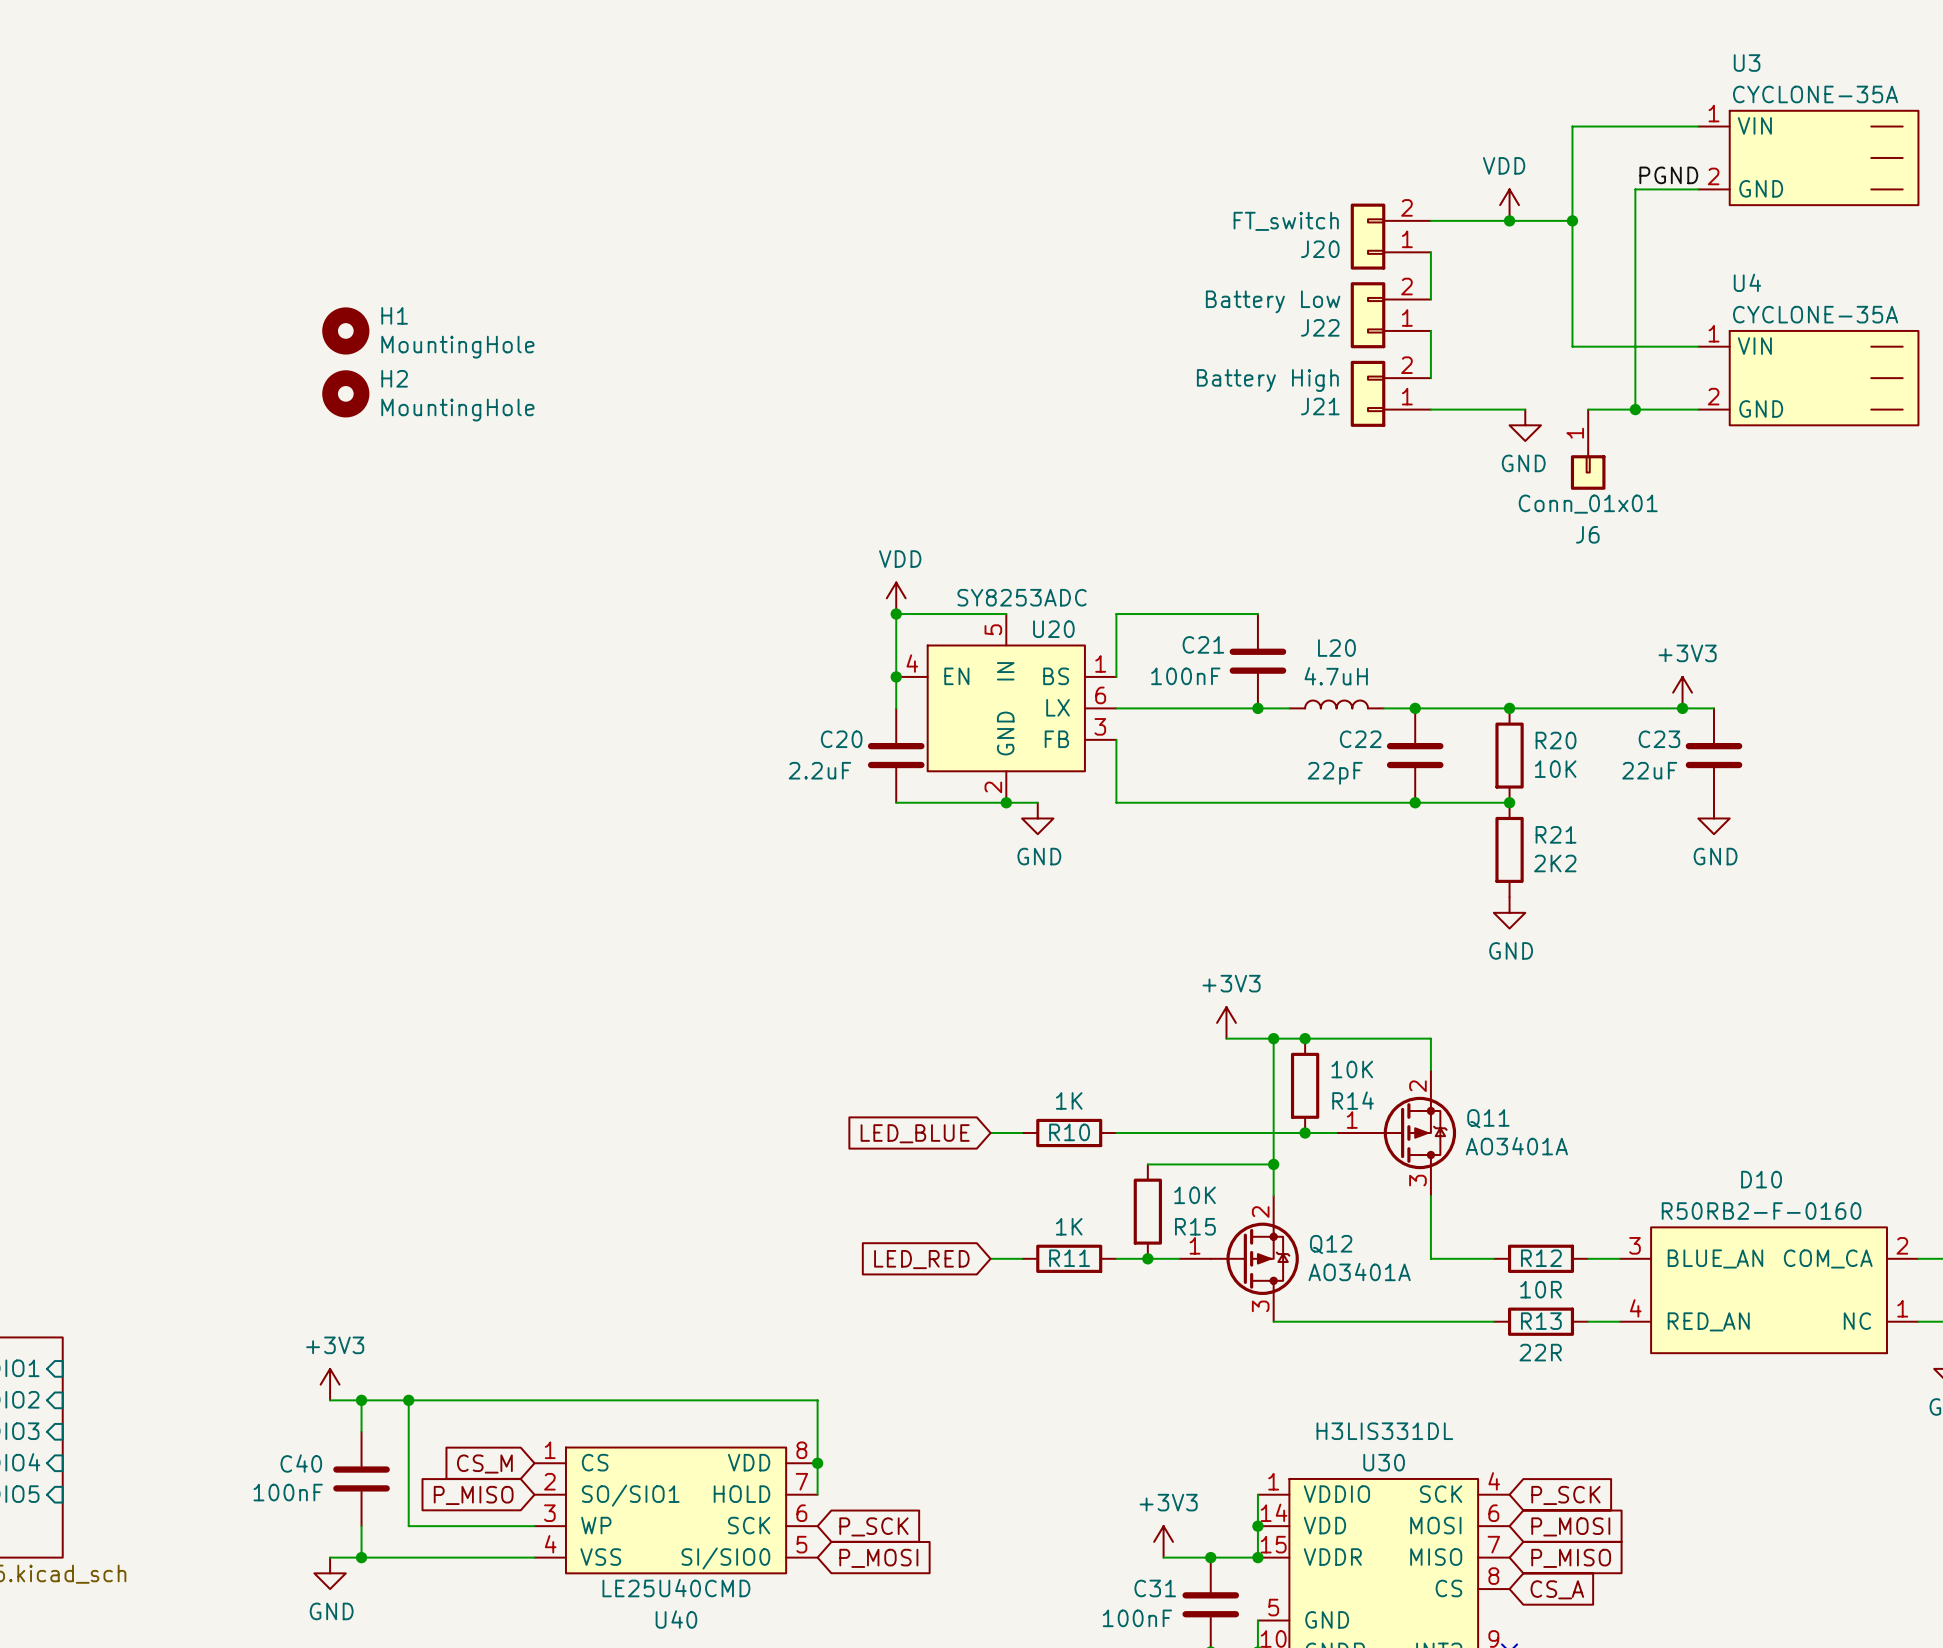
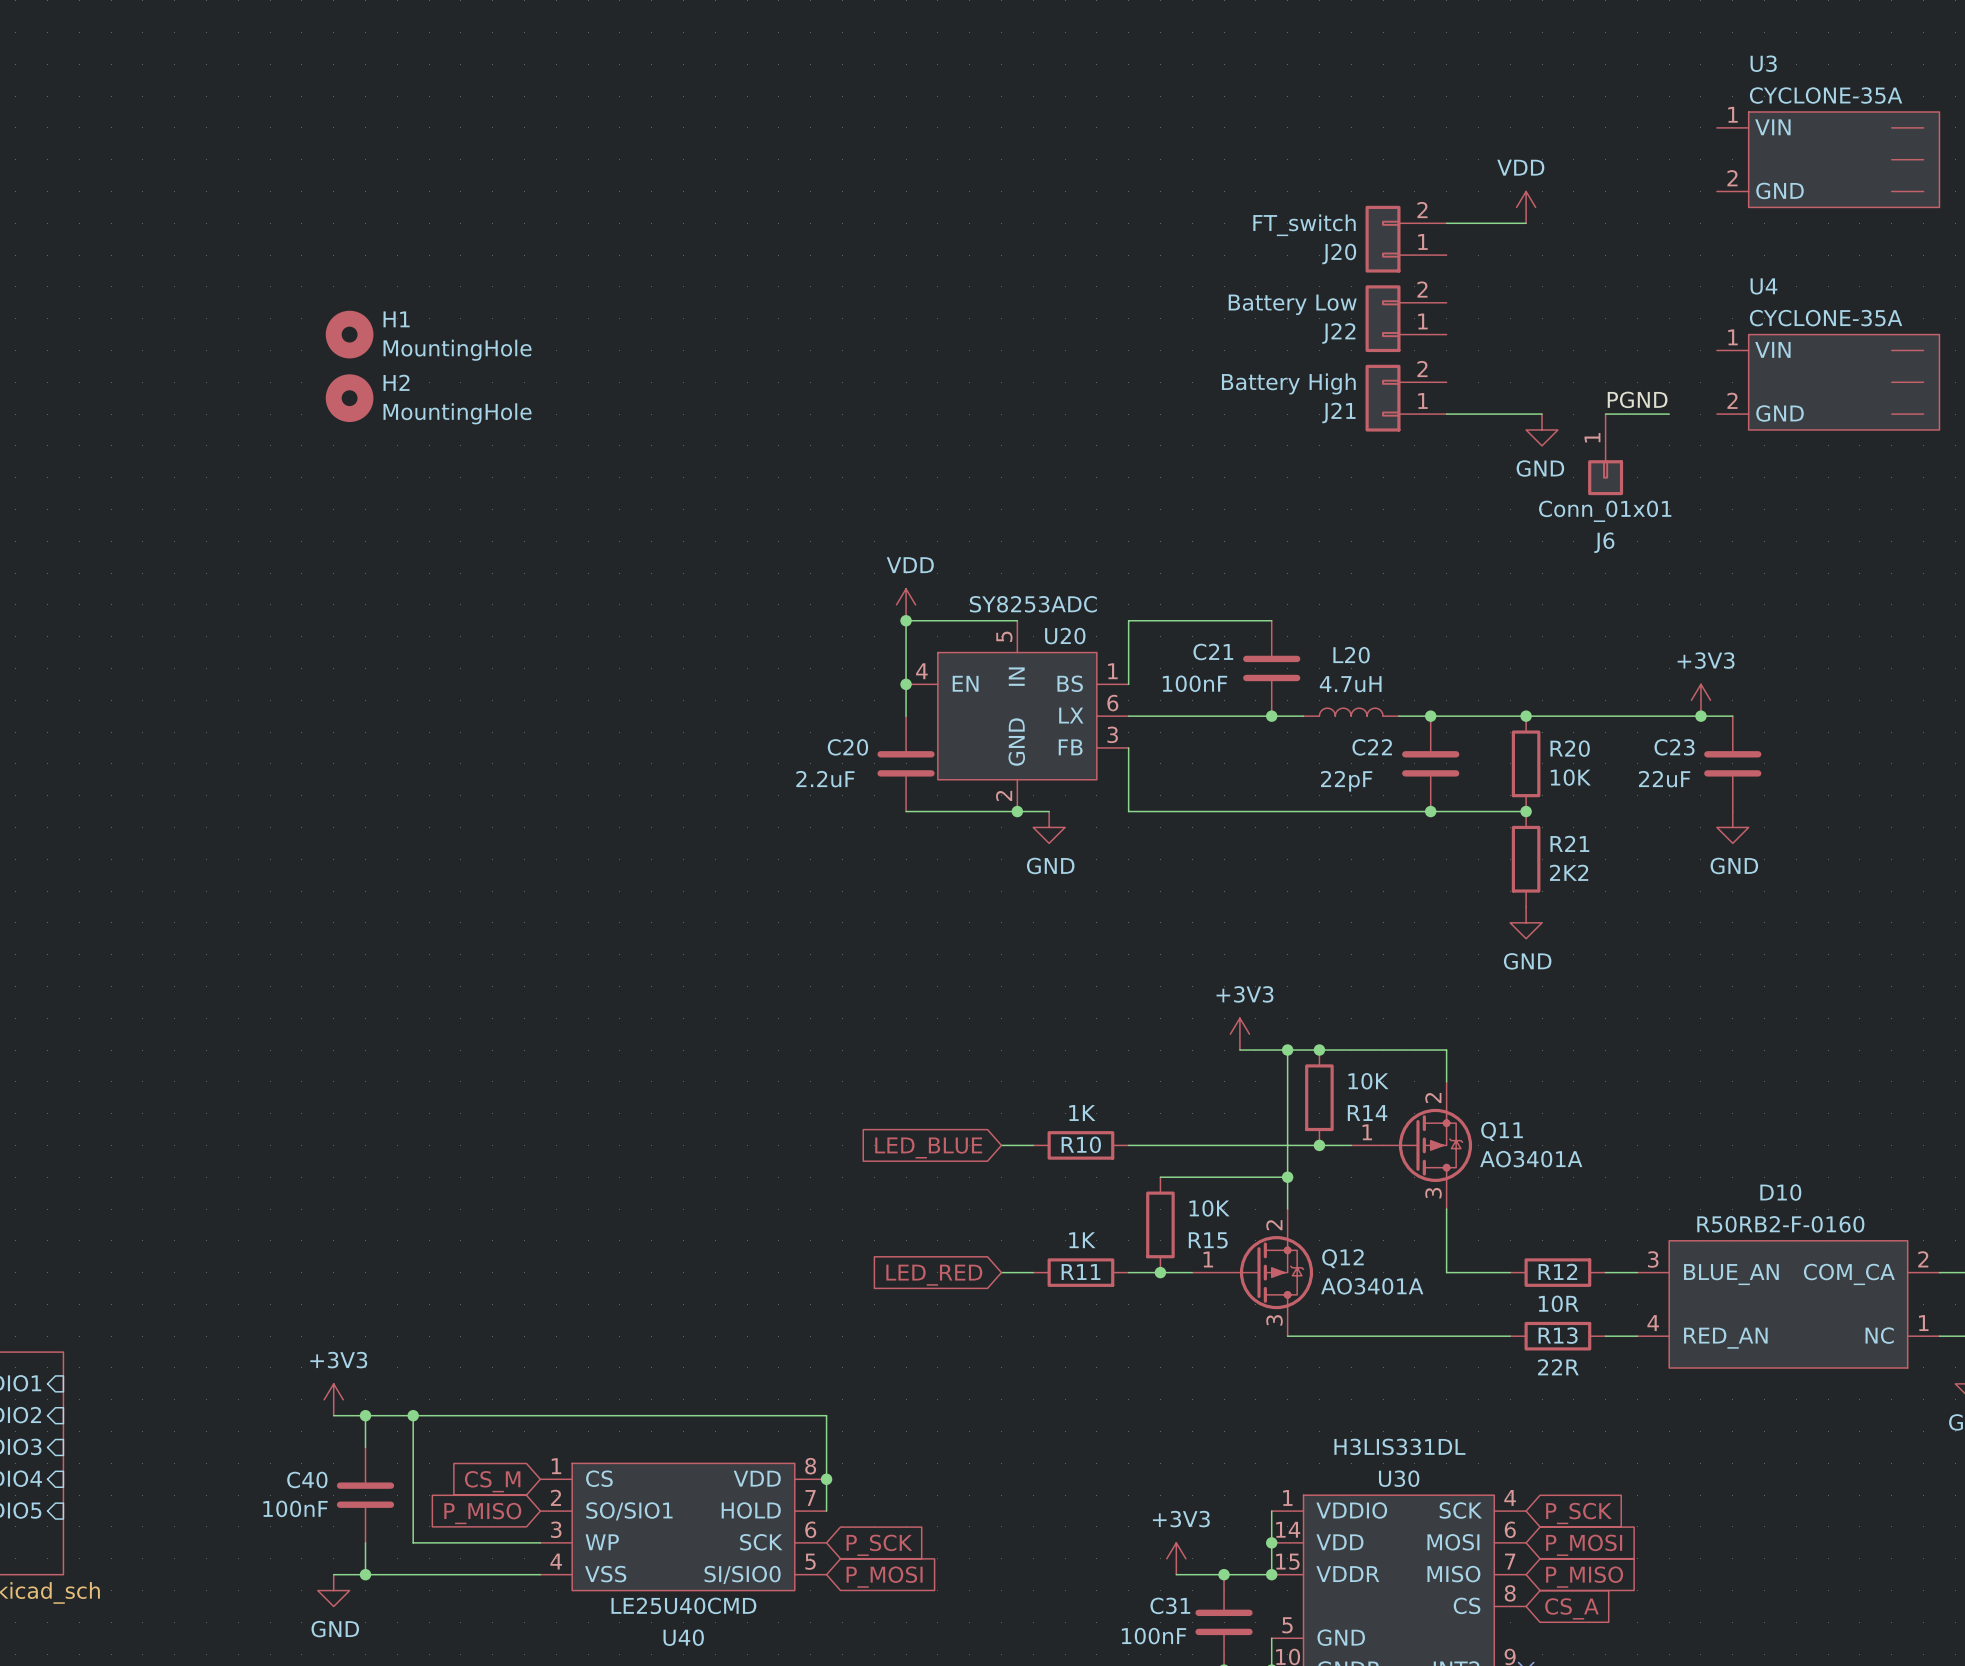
wire: (1698, 126) (1572, 126) (1572, 346) (1698, 346) -> none
label position: PGND (1668, 175) -> PGND (1637, 399)
wire: (1698, 189) (1635, 189) (1635, 409) -> none
wire: (1509, 220) (1572, 220) -> none
junction: (1509, 220) -> none
junction: (1572, 220) -> none
wire: (1430, 252) (1430, 299) -> none
wire: (1430, 330) (1430, 378) -> none
junction: (1635, 409) -> none
wire: (1651, 409) (1698, 409) -> none

